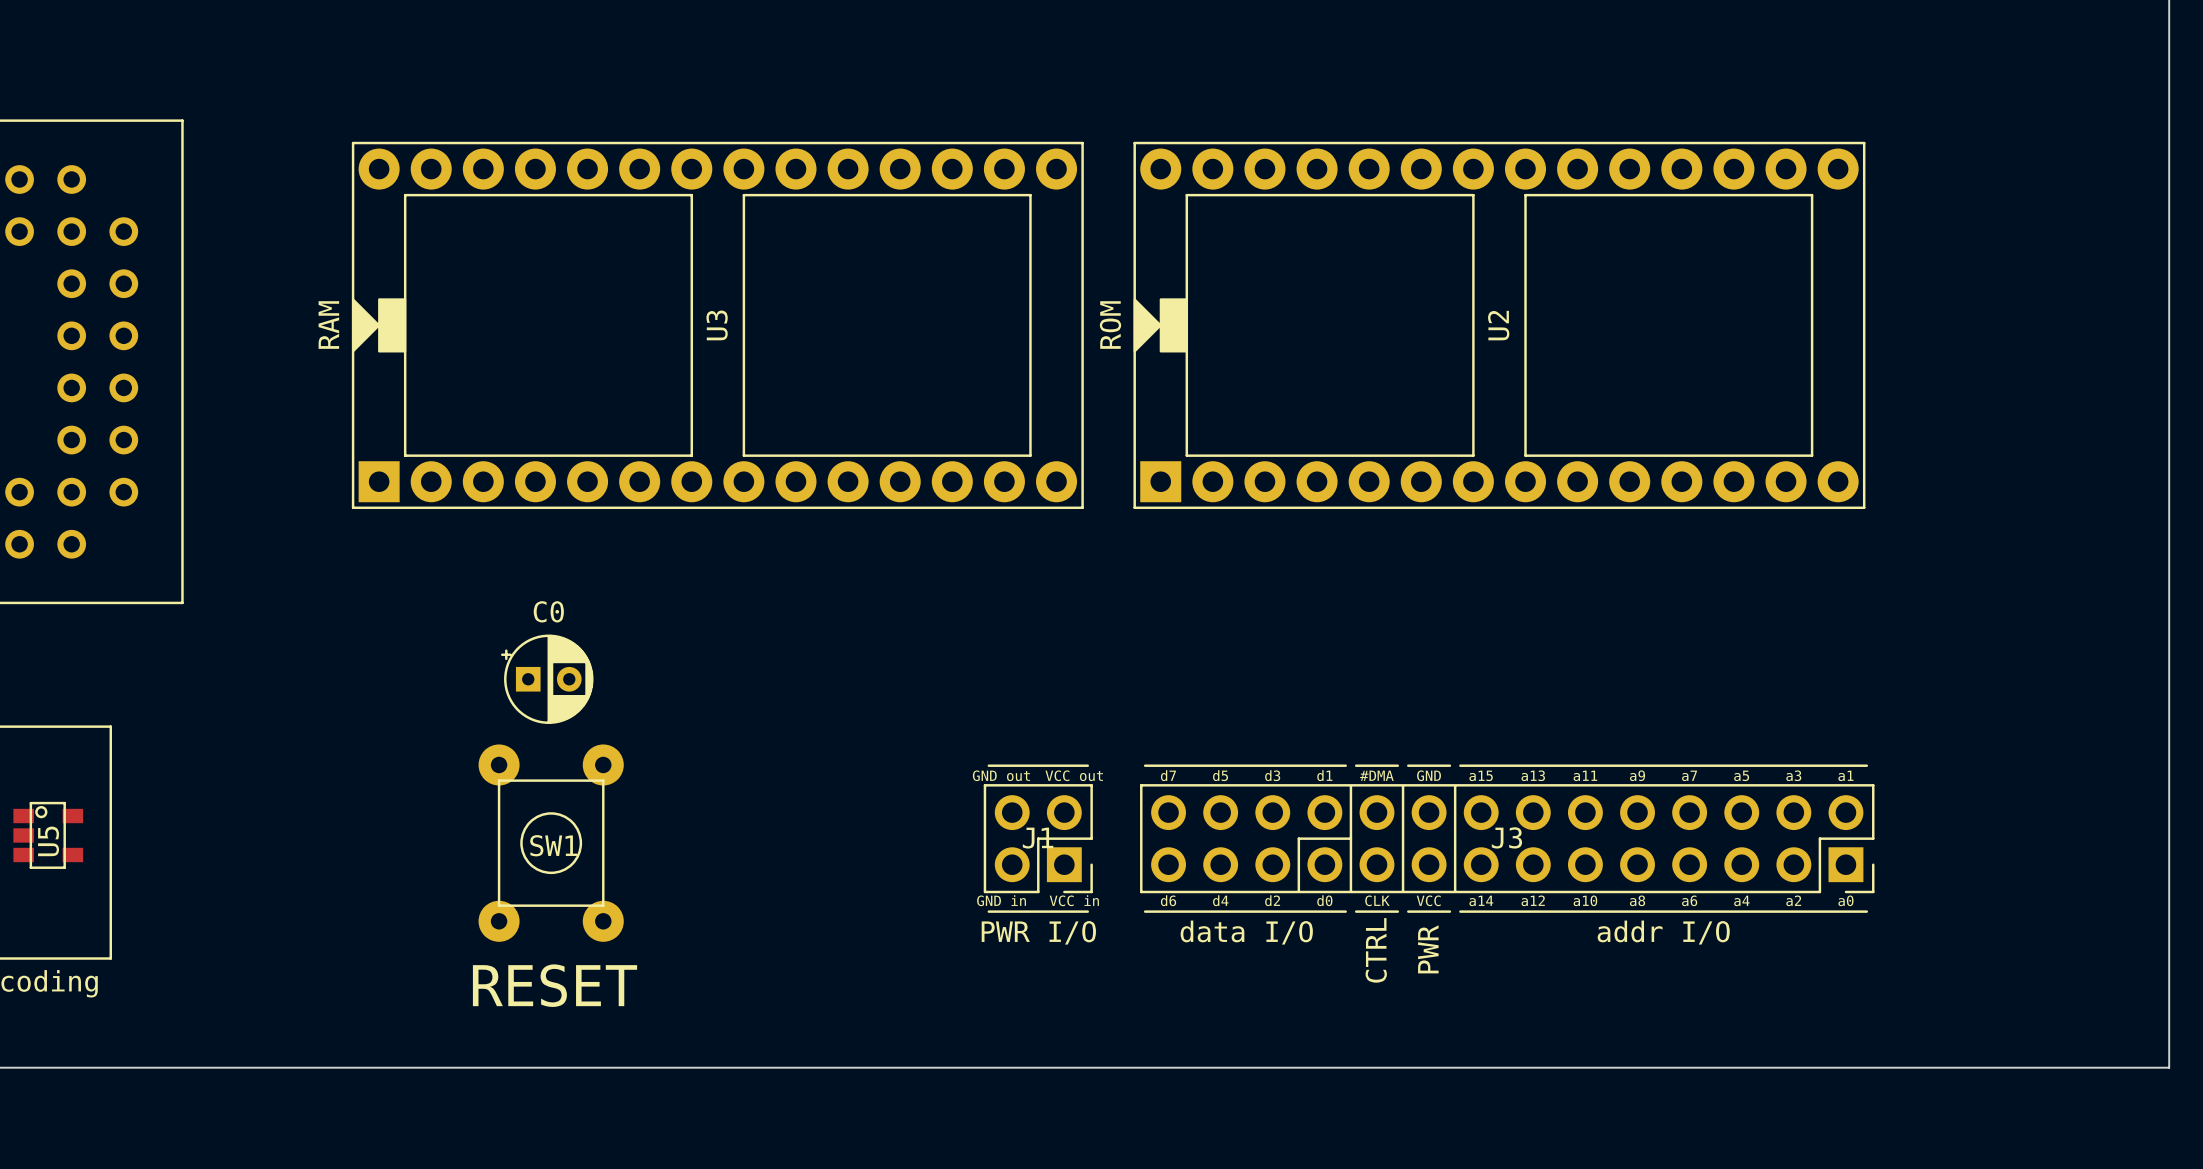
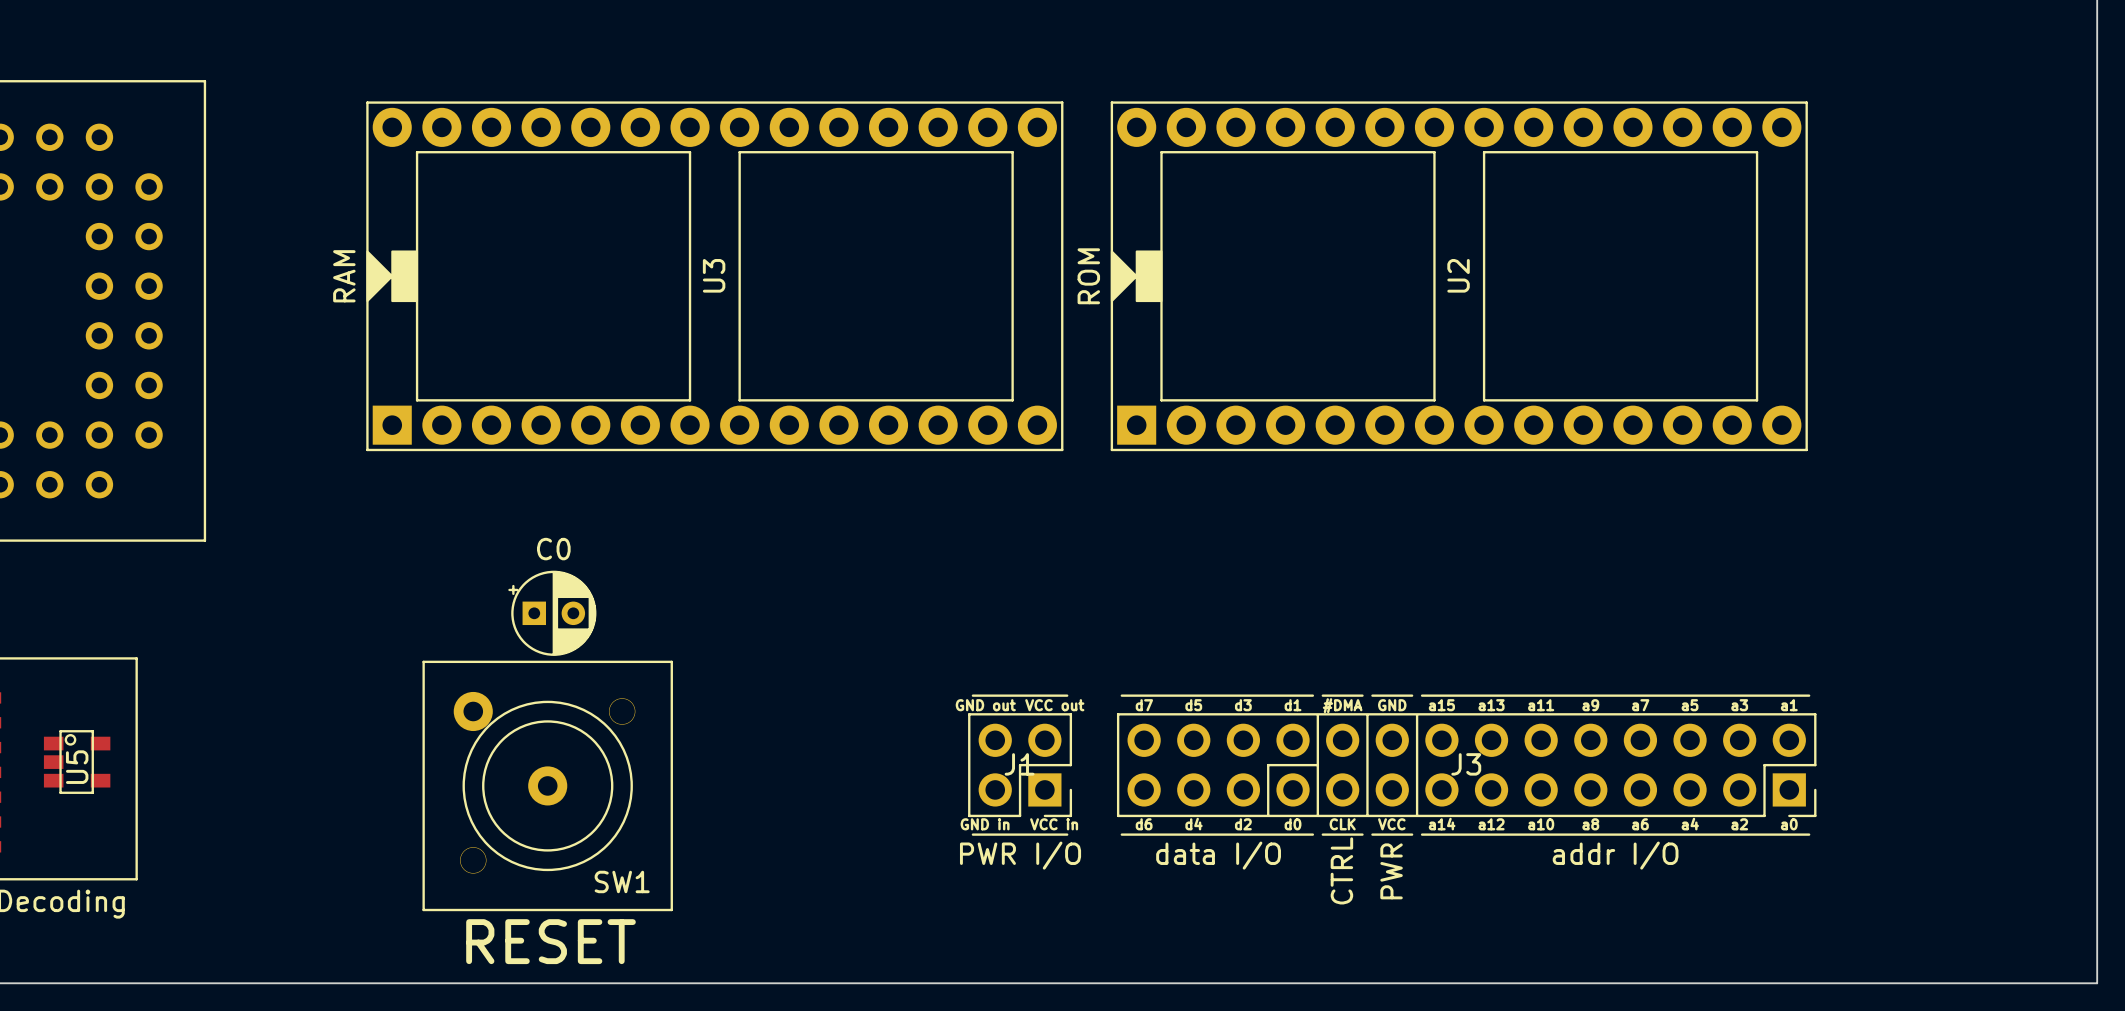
SW1 footprint: [478, 744, 624, 942] -> [422, 660, 673, 912]
SW1 name position: SW1 (553, 845) -> SW1 (622, 881)
text position: RESET (555, 985) -> RESET (551, 941)

